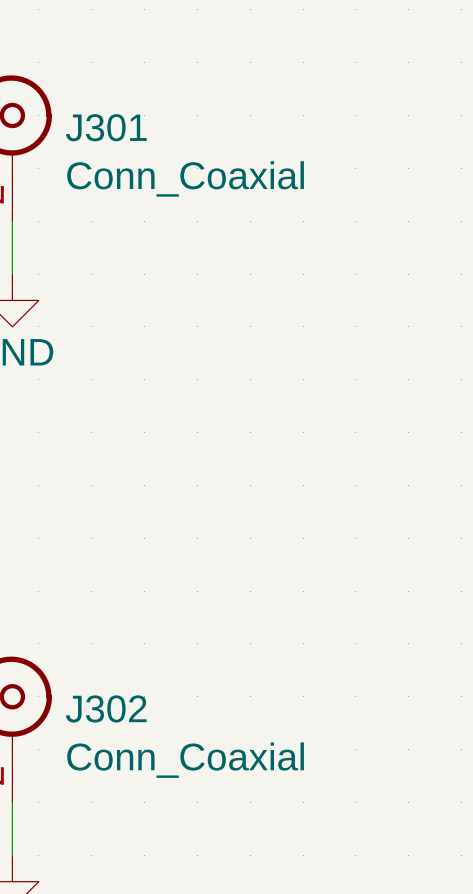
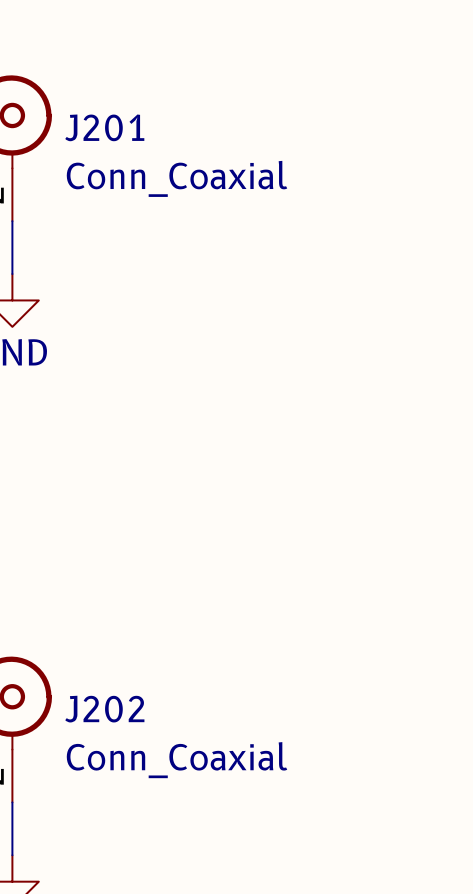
J301 name: J301 (106, 127) -> J201 (104, 127)
J302 name: J302 (106, 708) -> J202 (104, 709)

